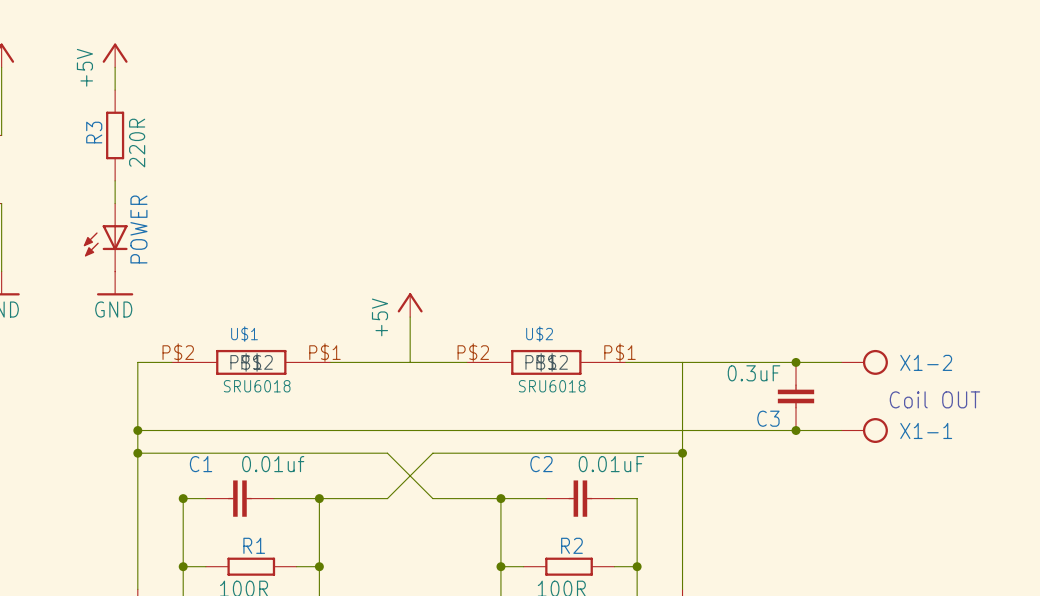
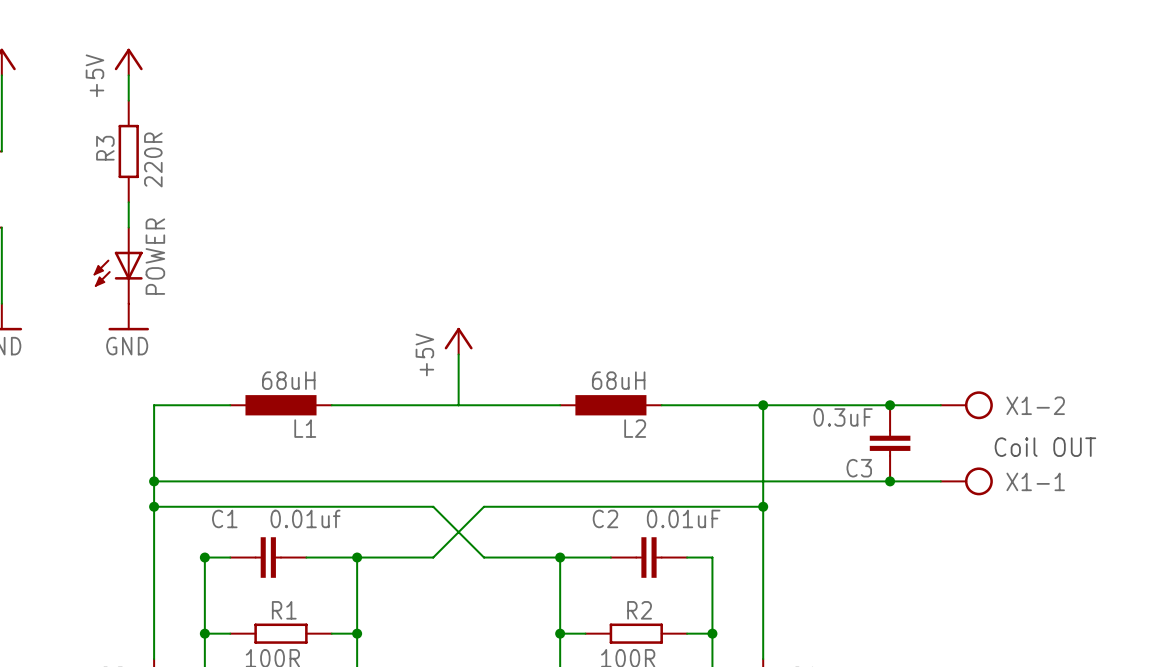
U$1: SRU6018 (251, 362) -> none
L1: none -> 68uH (281, 405)
U$2: SRU6018 (546, 362) -> none
L2: none -> 68uH (610, 405)
junction: none -> (763, 405)

